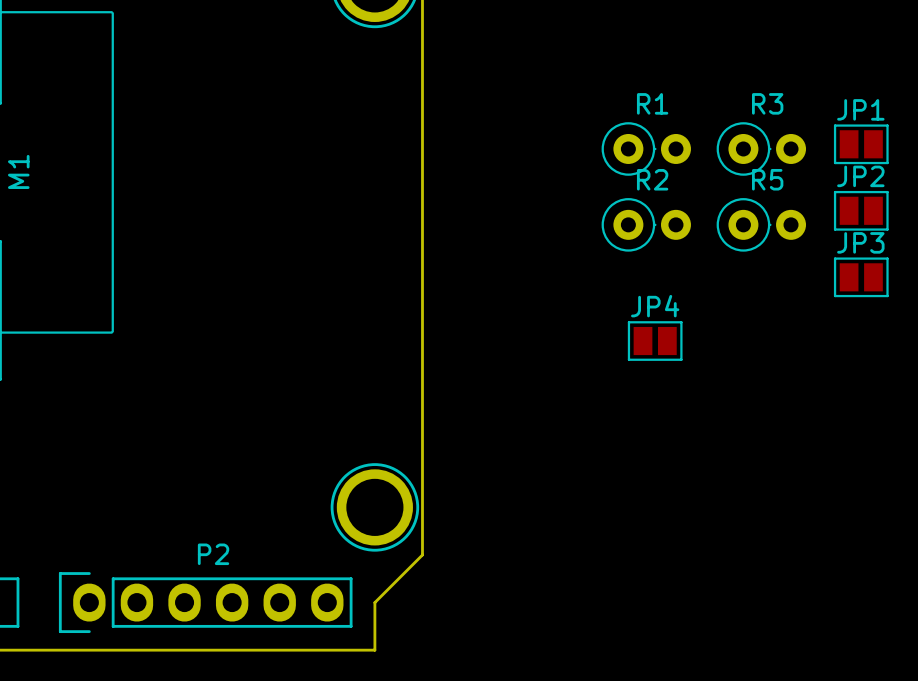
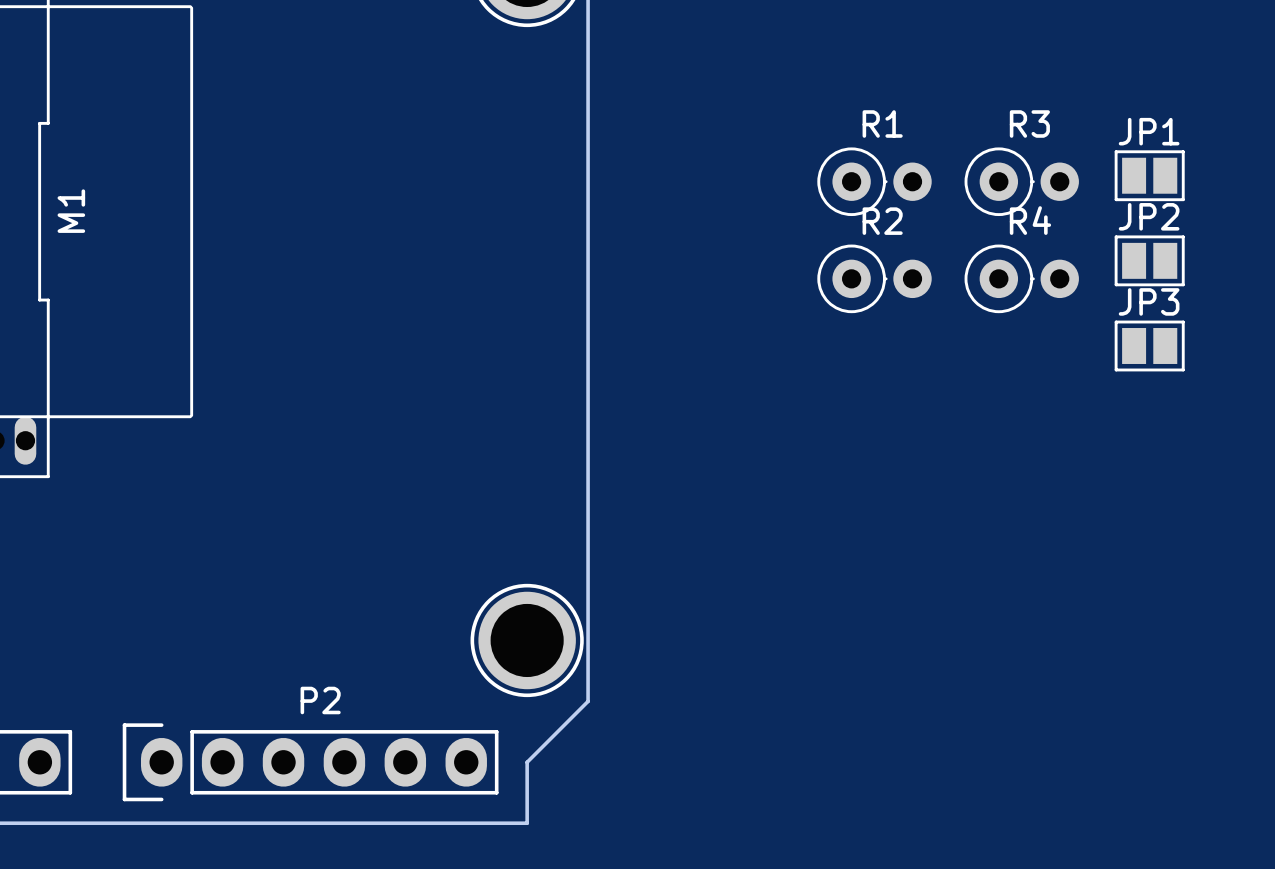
R5 name: R5 (767, 179) -> R4 (1030, 220)
JP4: (655, 341) -> none

